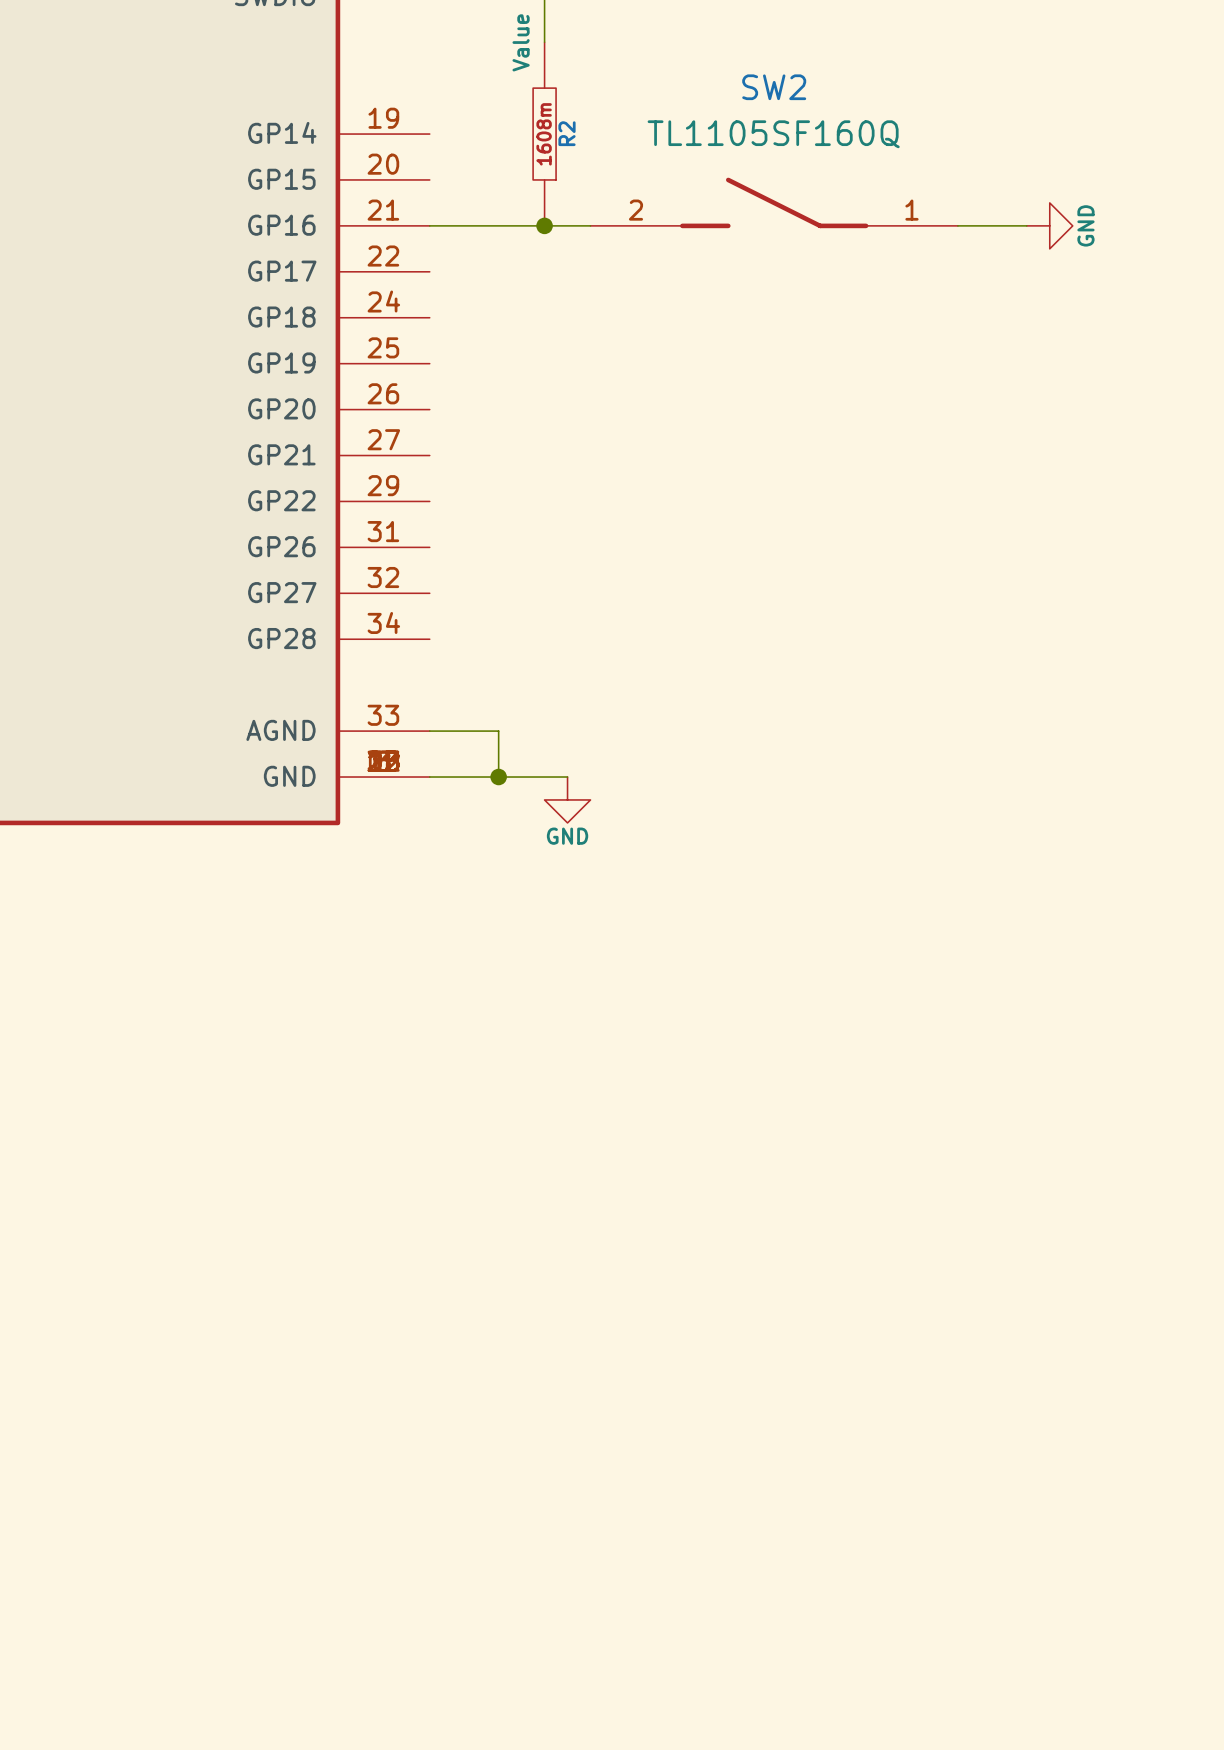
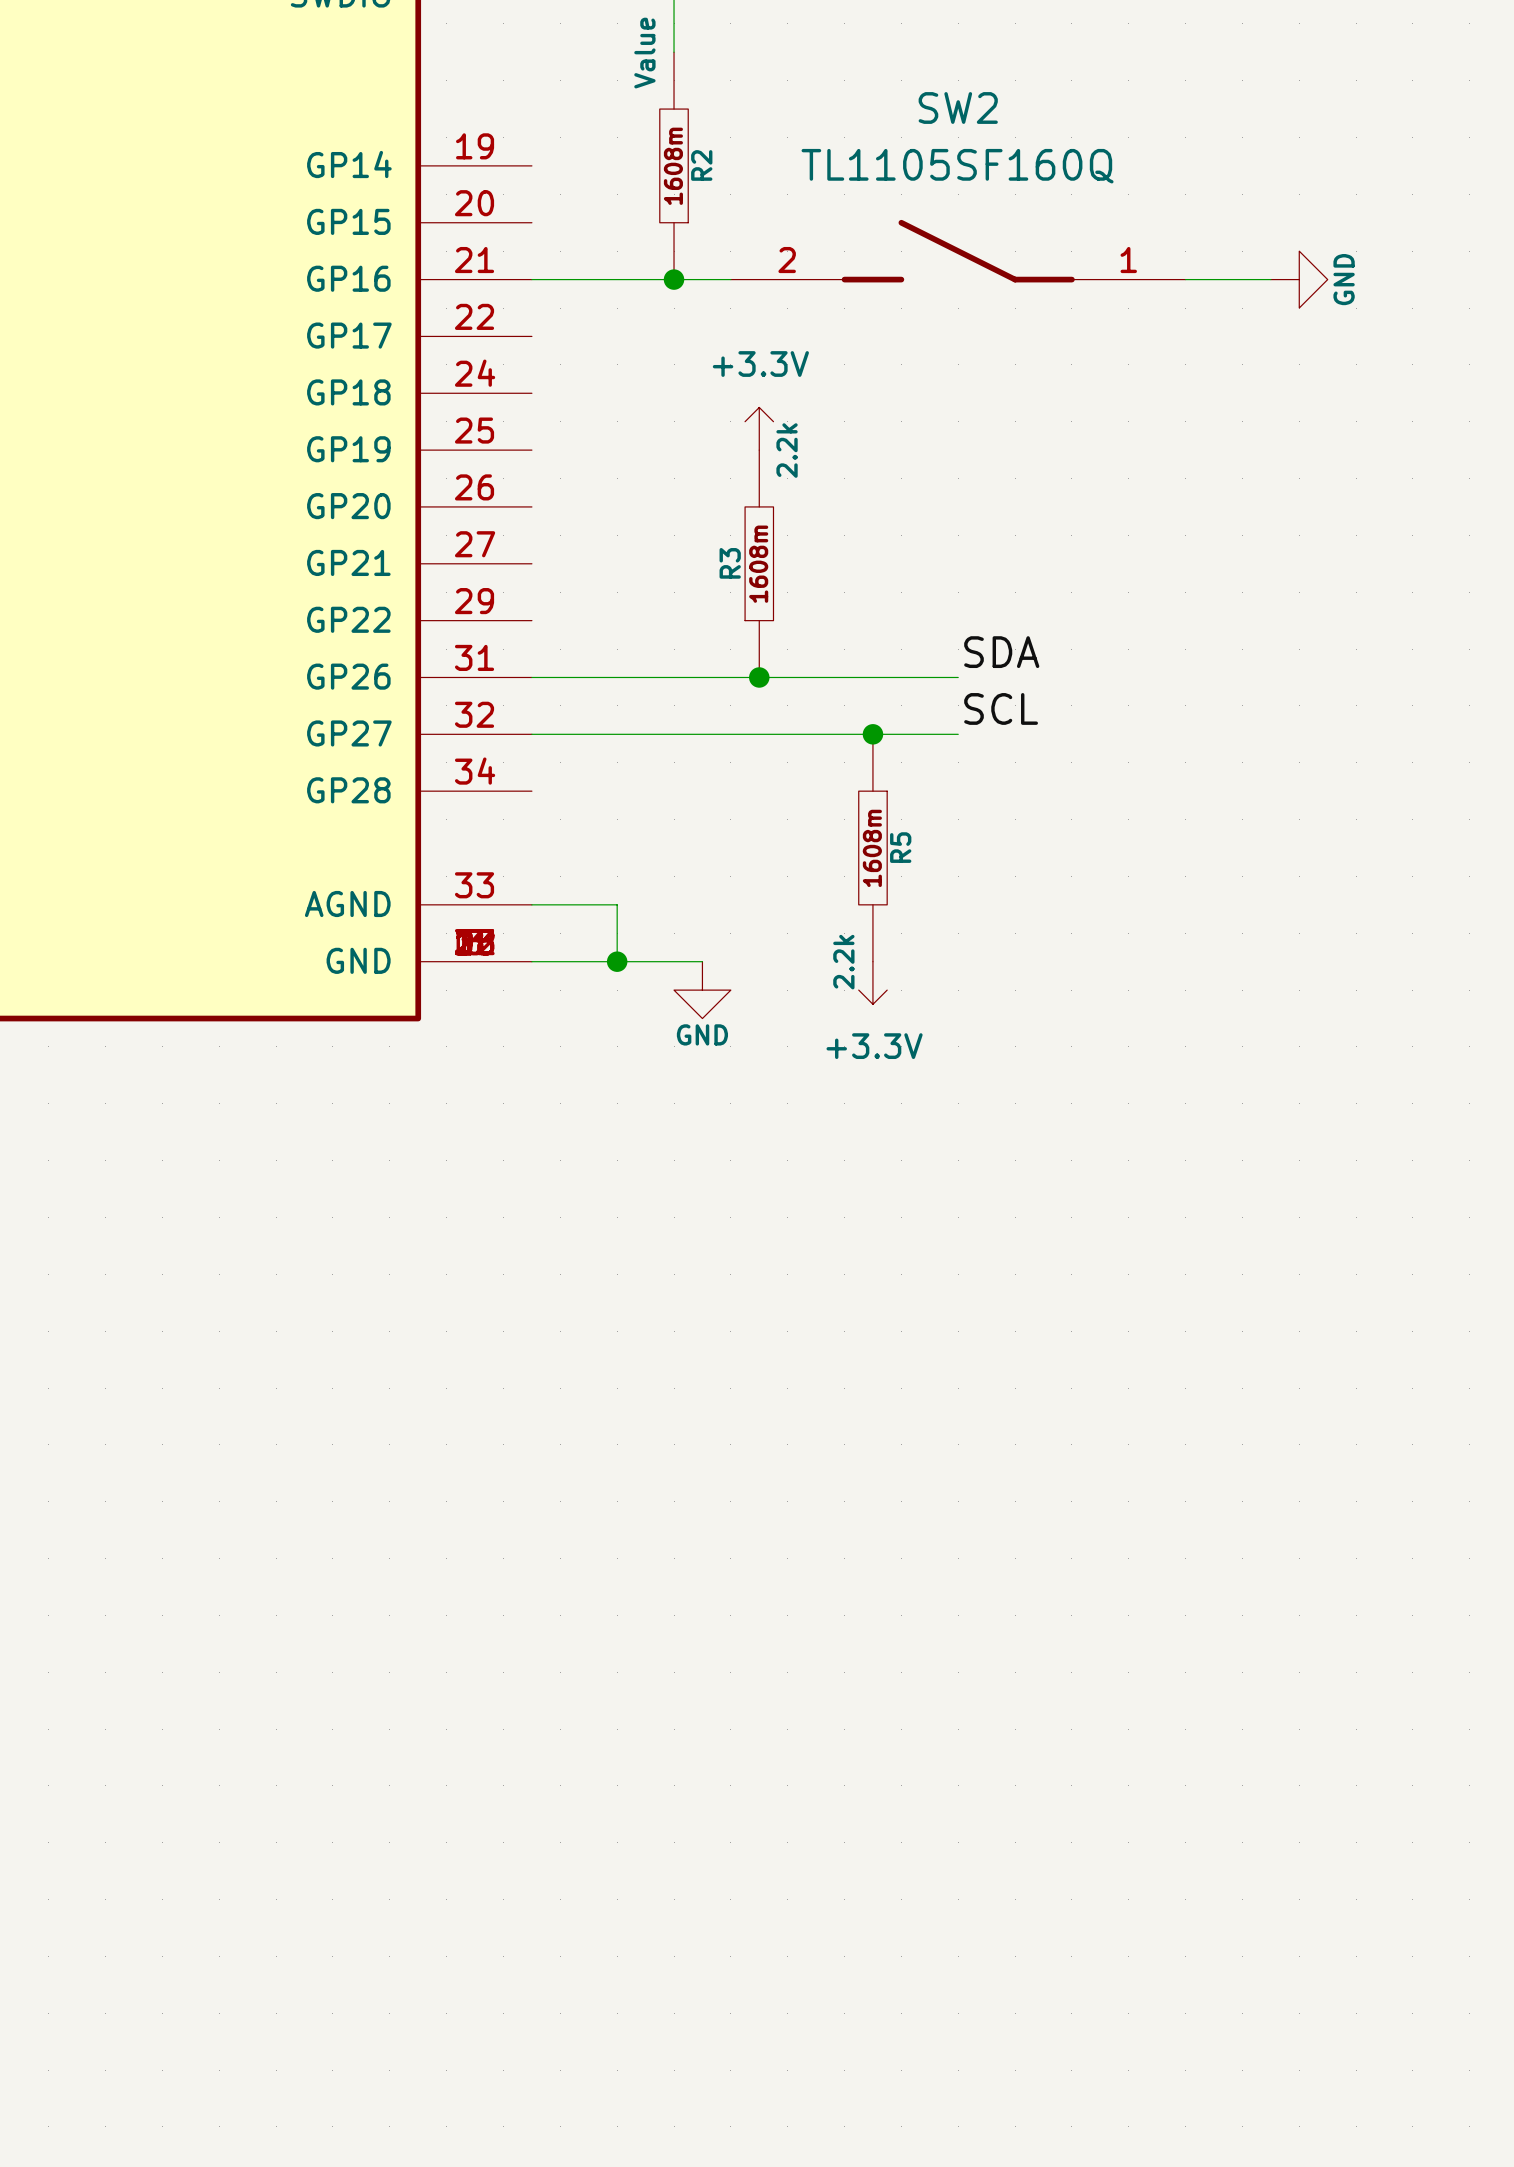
power symbol: none -> +3.3V (759, 428)
R3: none -> 2.2k (759, 563)
label: none -> SDA (1001, 652)
wire: none -> (531, 677) (958, 677)
junction: none -> (759, 677)
label: none -> SCL (1001, 708)
wire: none -> (531, 734) (958, 734)
junction: none -> (872, 734)
R5: none -> 2.2k (872, 848)
power symbol: none -> +3.3V (872, 983)

